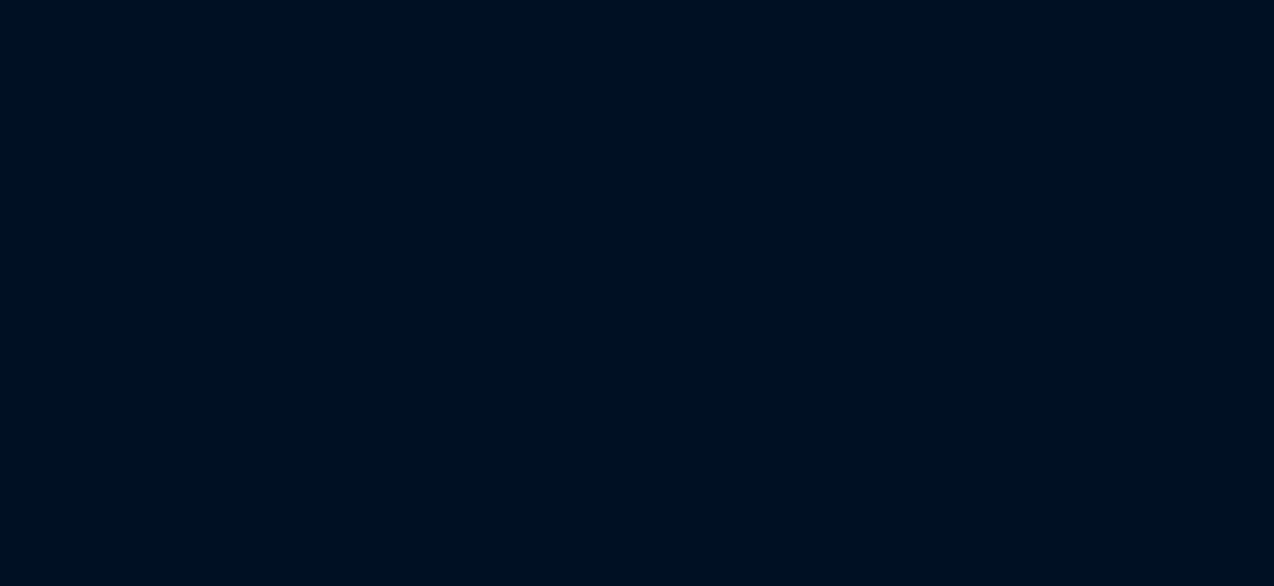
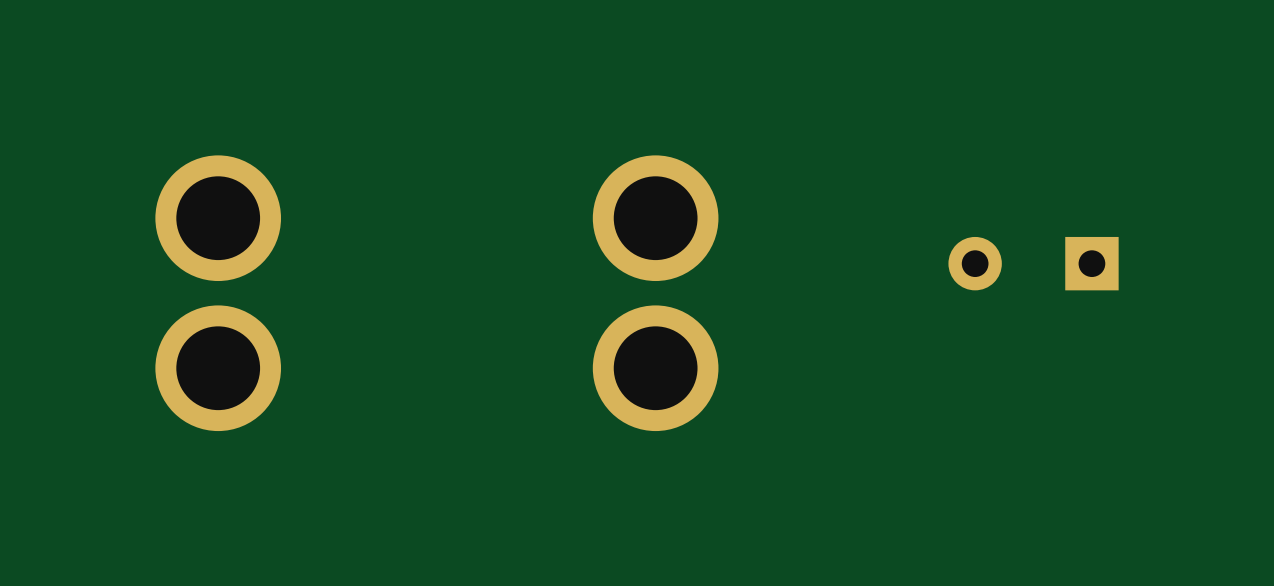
part: none -> (1033, 263)
part: none -> (218, 293)
part: none -> (655, 293)

